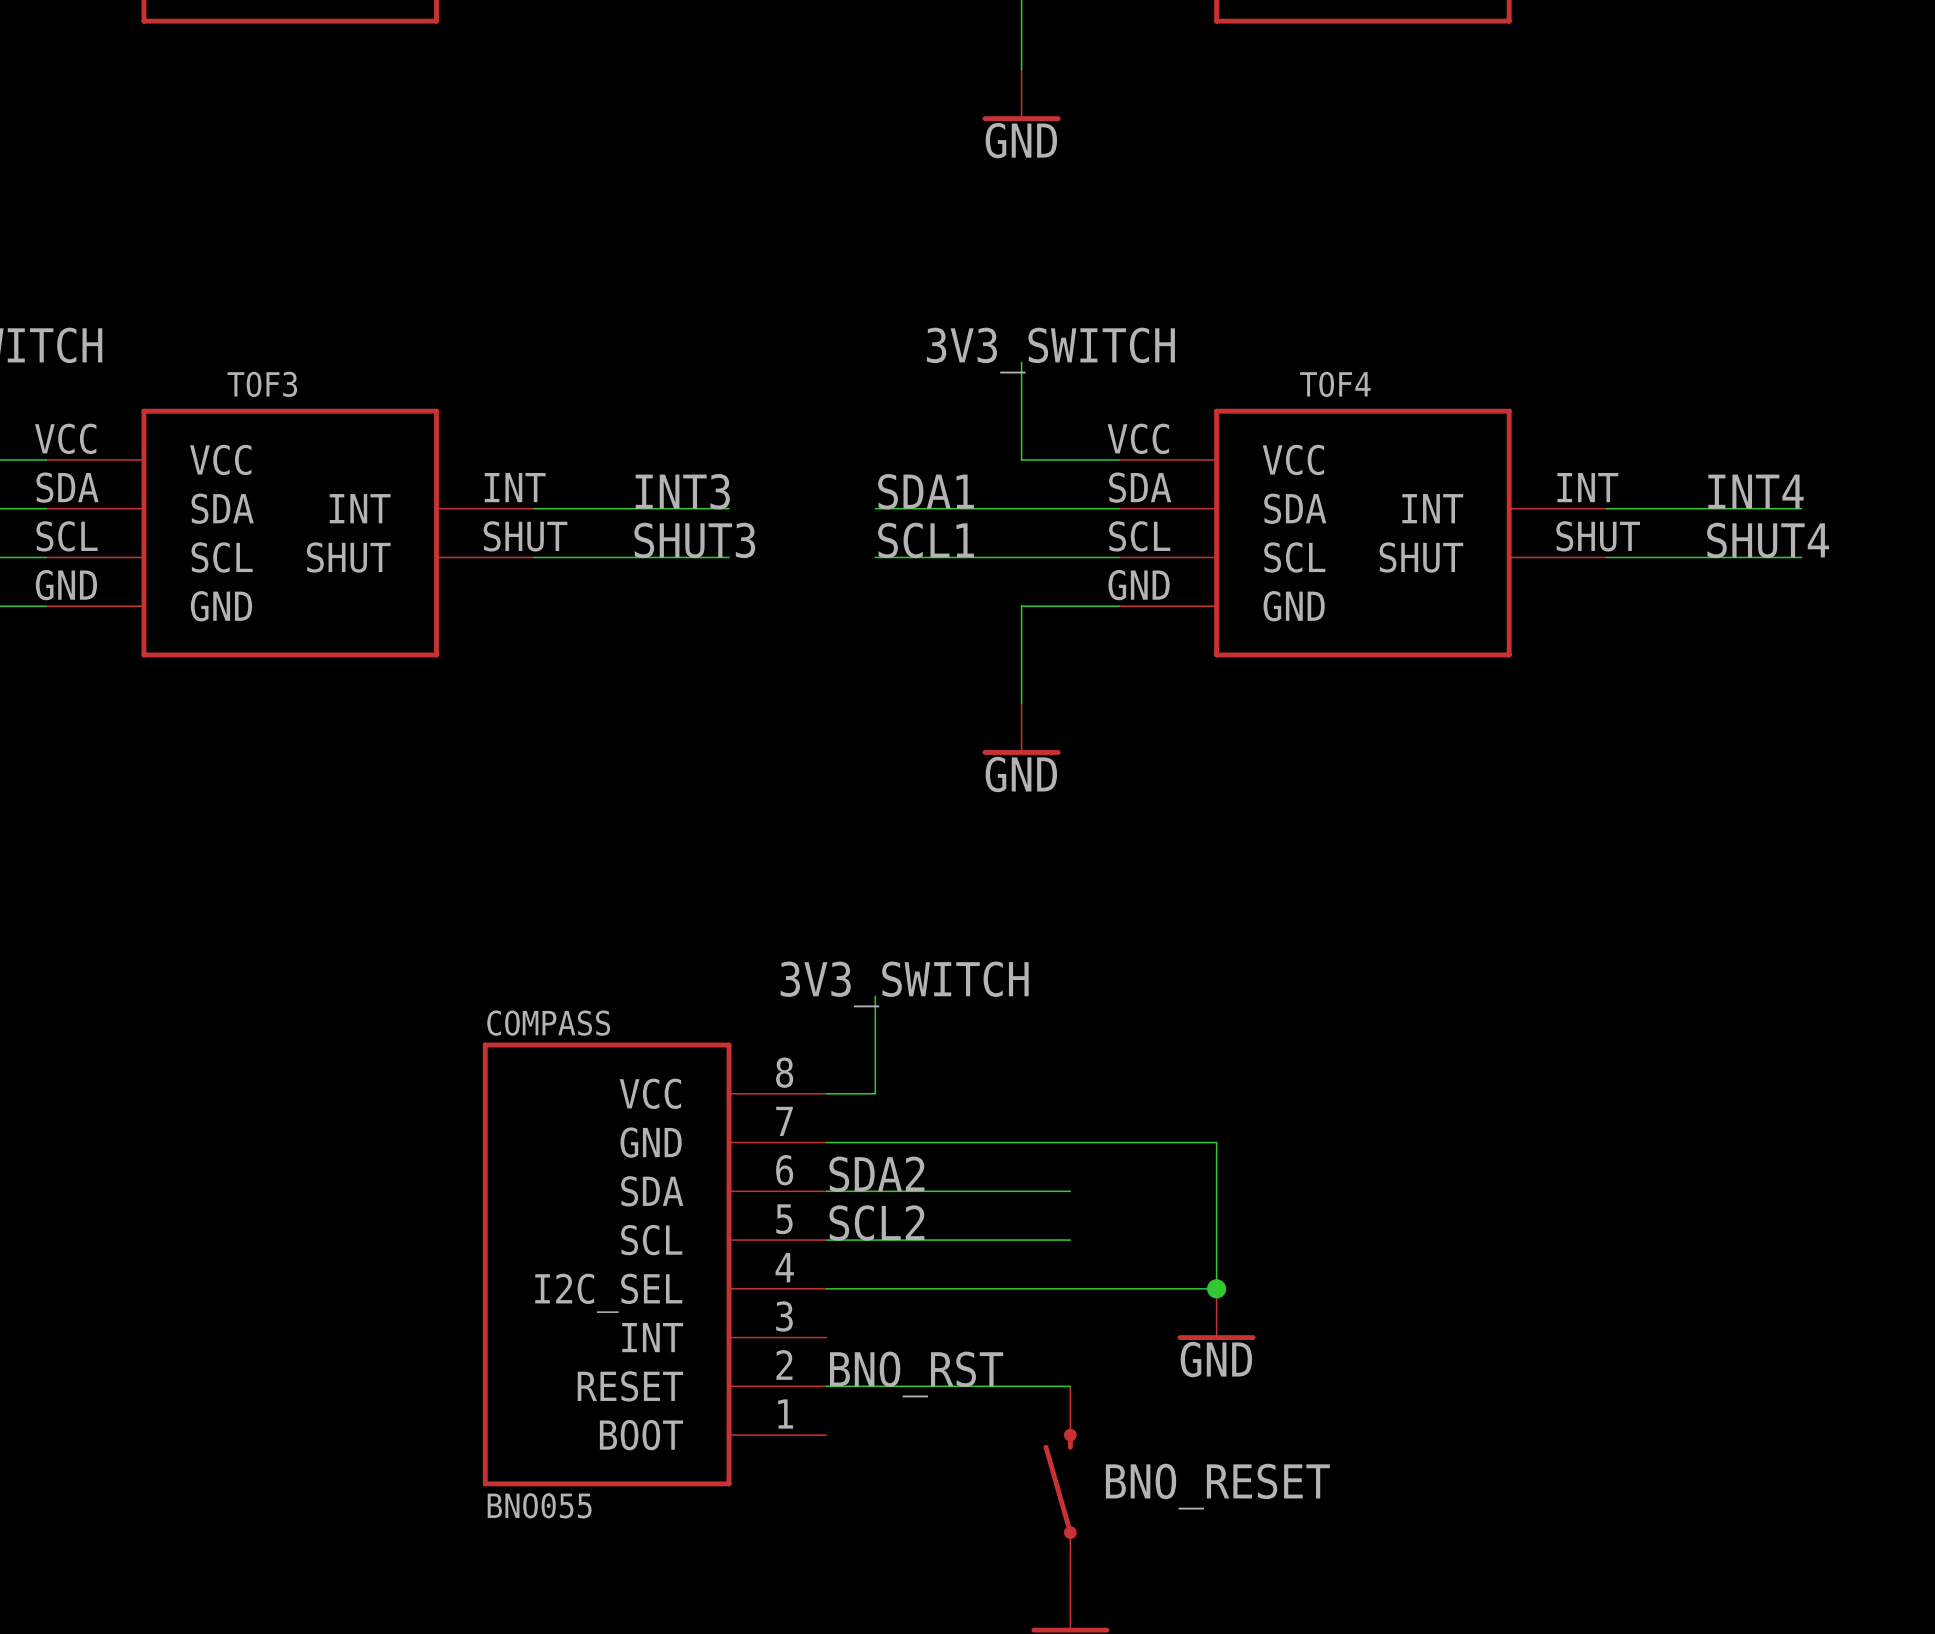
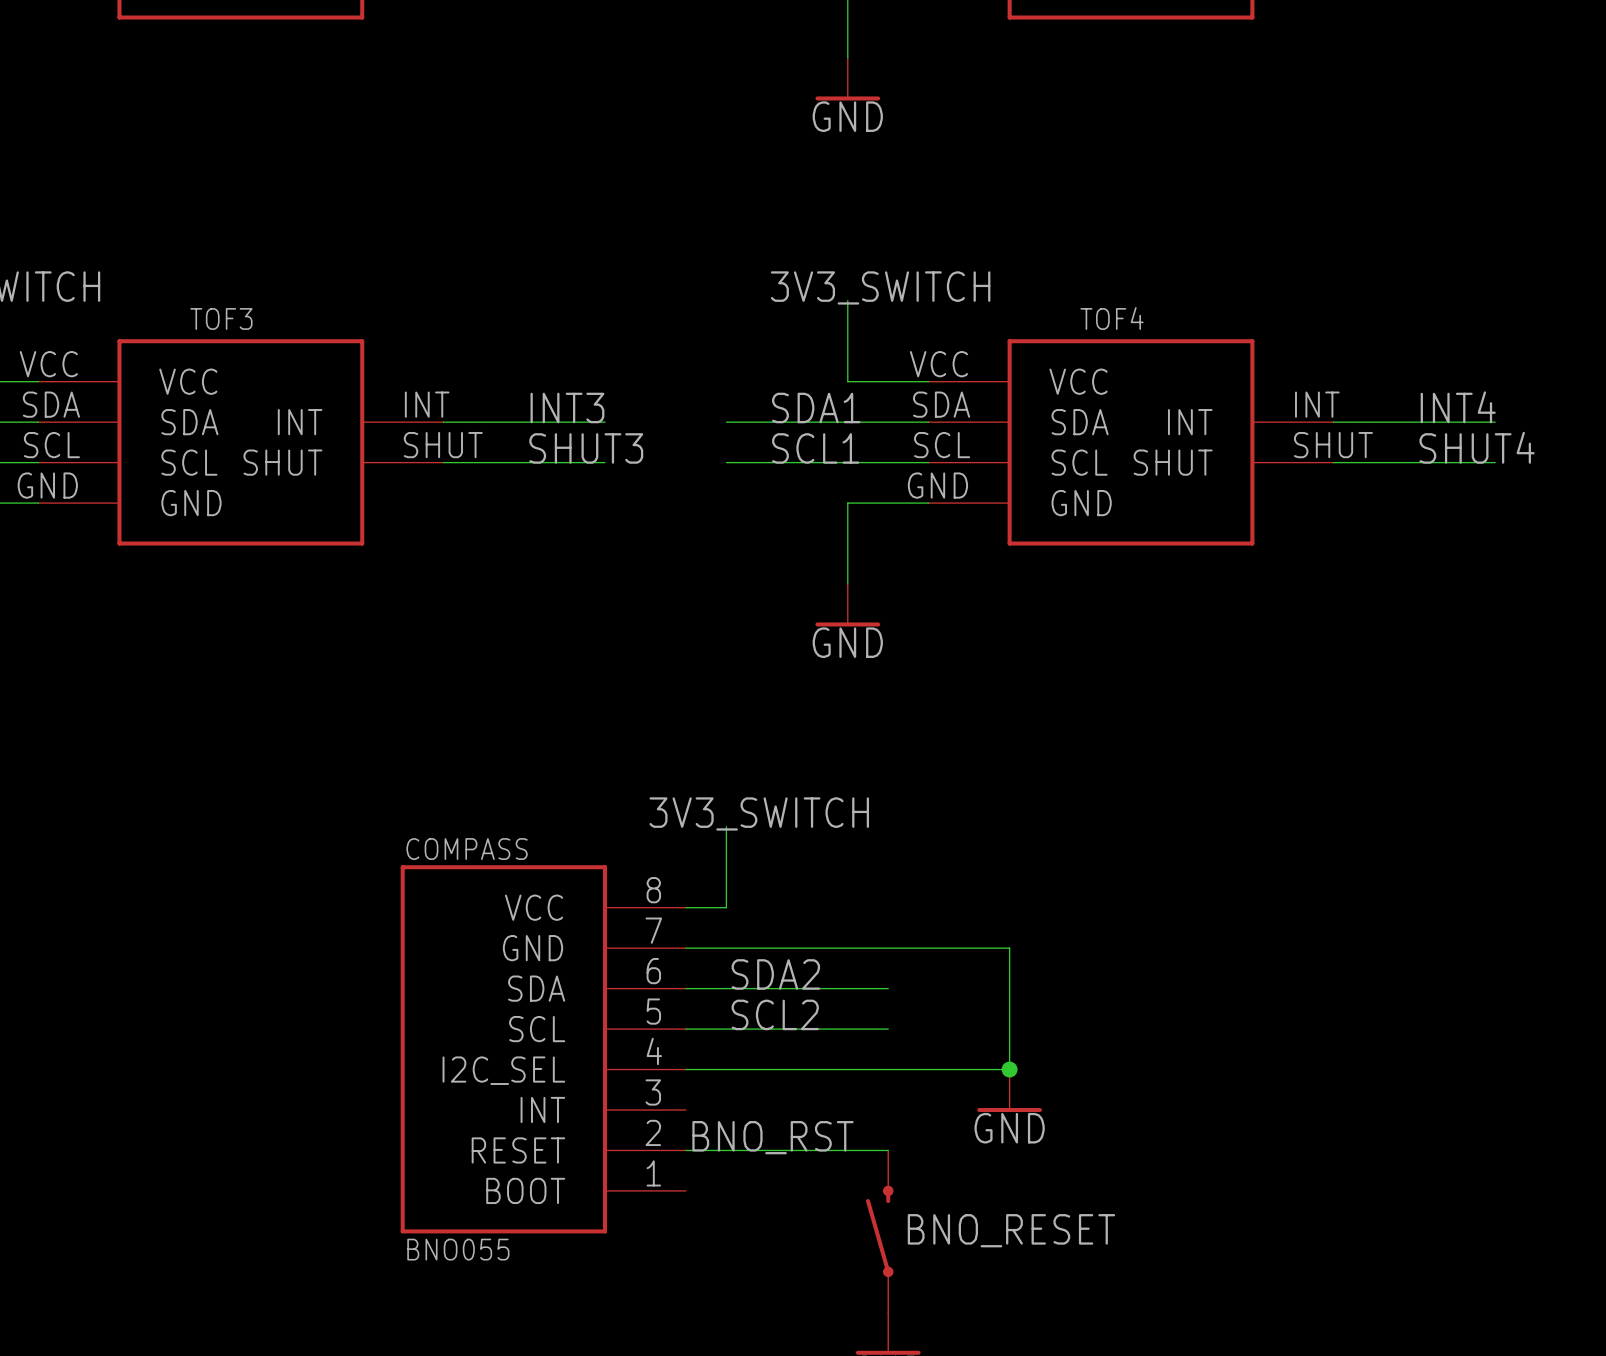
label position: SDA1 (926, 491) -> SDA1 (816, 407)
label position: SCL1 (926, 540) -> SCL1 (815, 448)
label position: SDA2 (876, 1174) -> SDA2 (775, 974)
label position: SCL2 (876, 1223) -> SCL2 (775, 1014)

